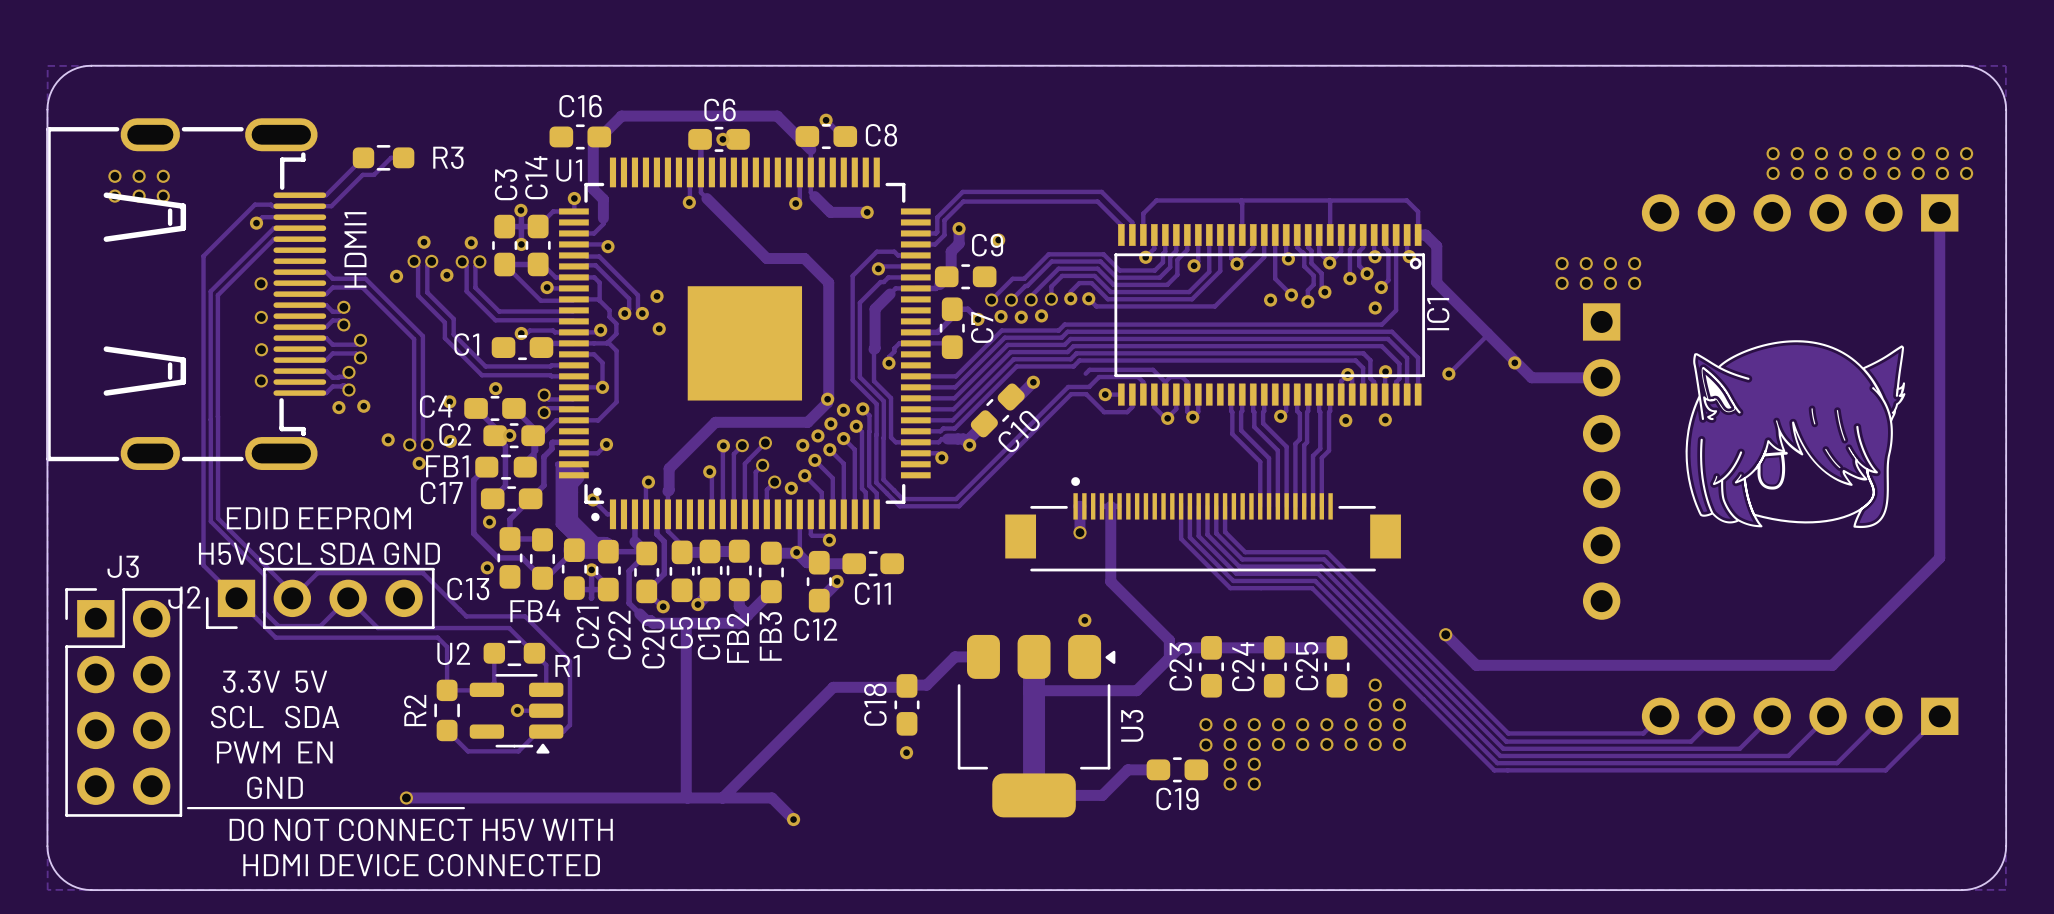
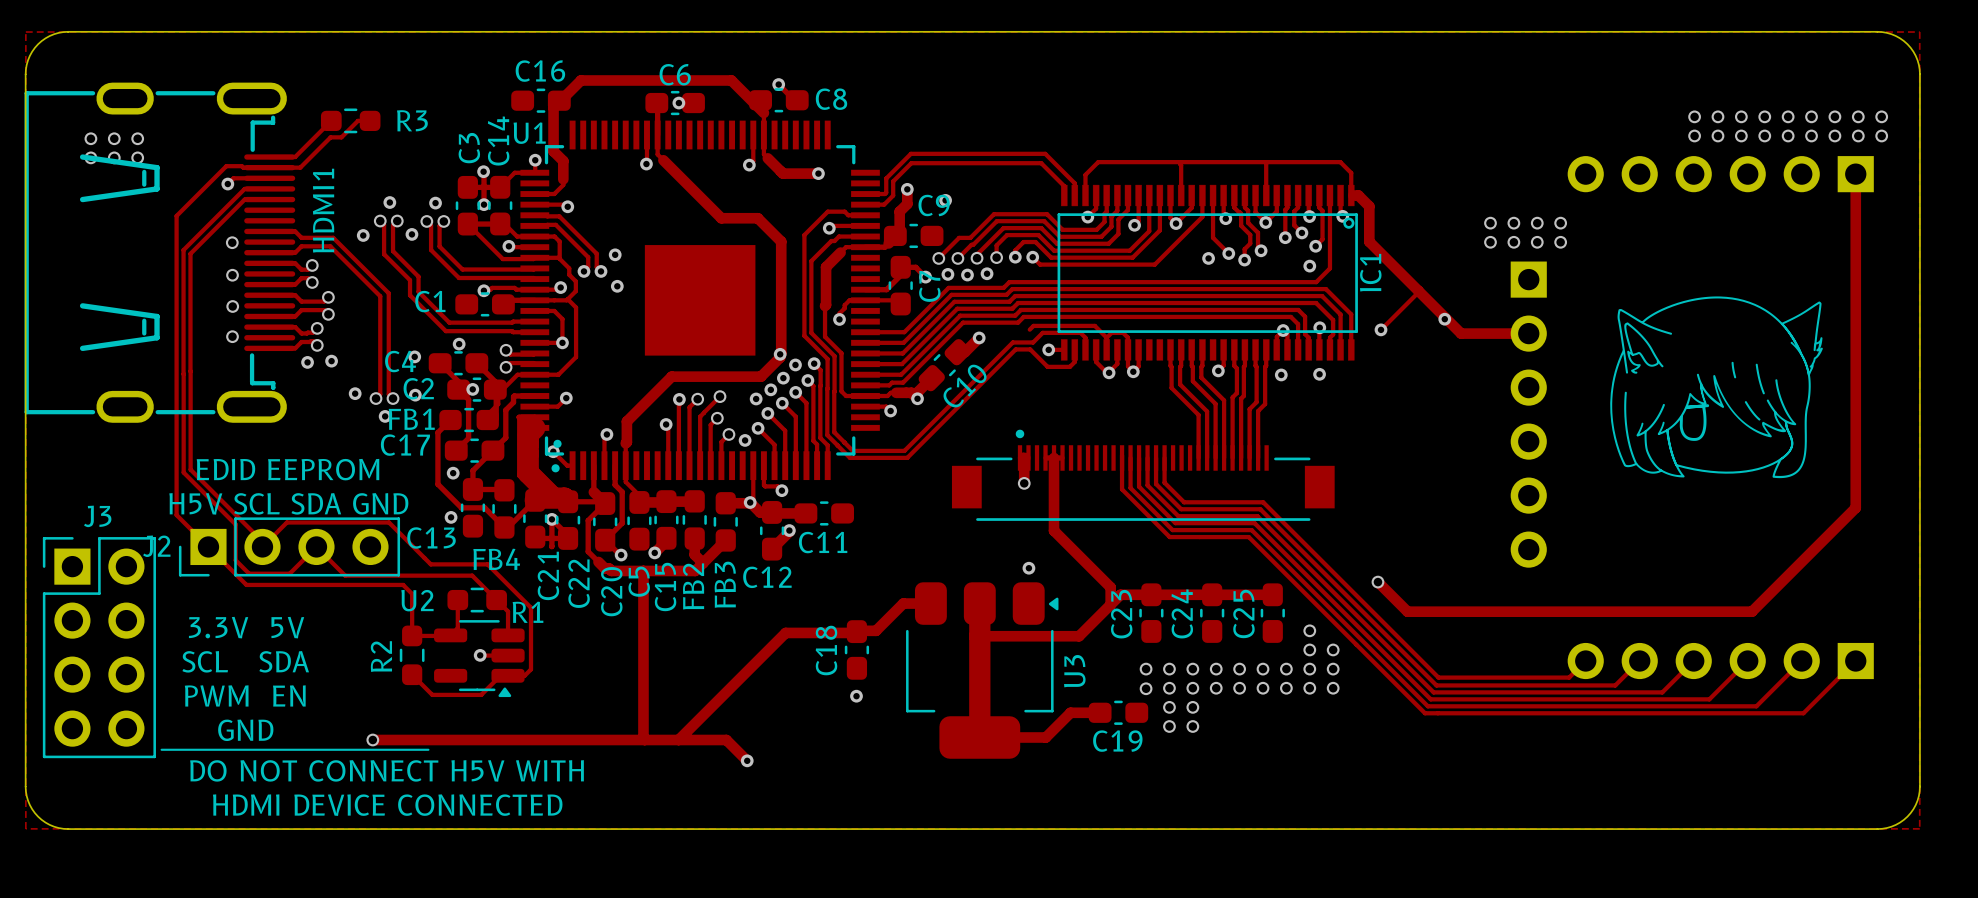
drawing shape: [1685, 340, 1906, 529] -> [1610, 296, 1823, 479]

